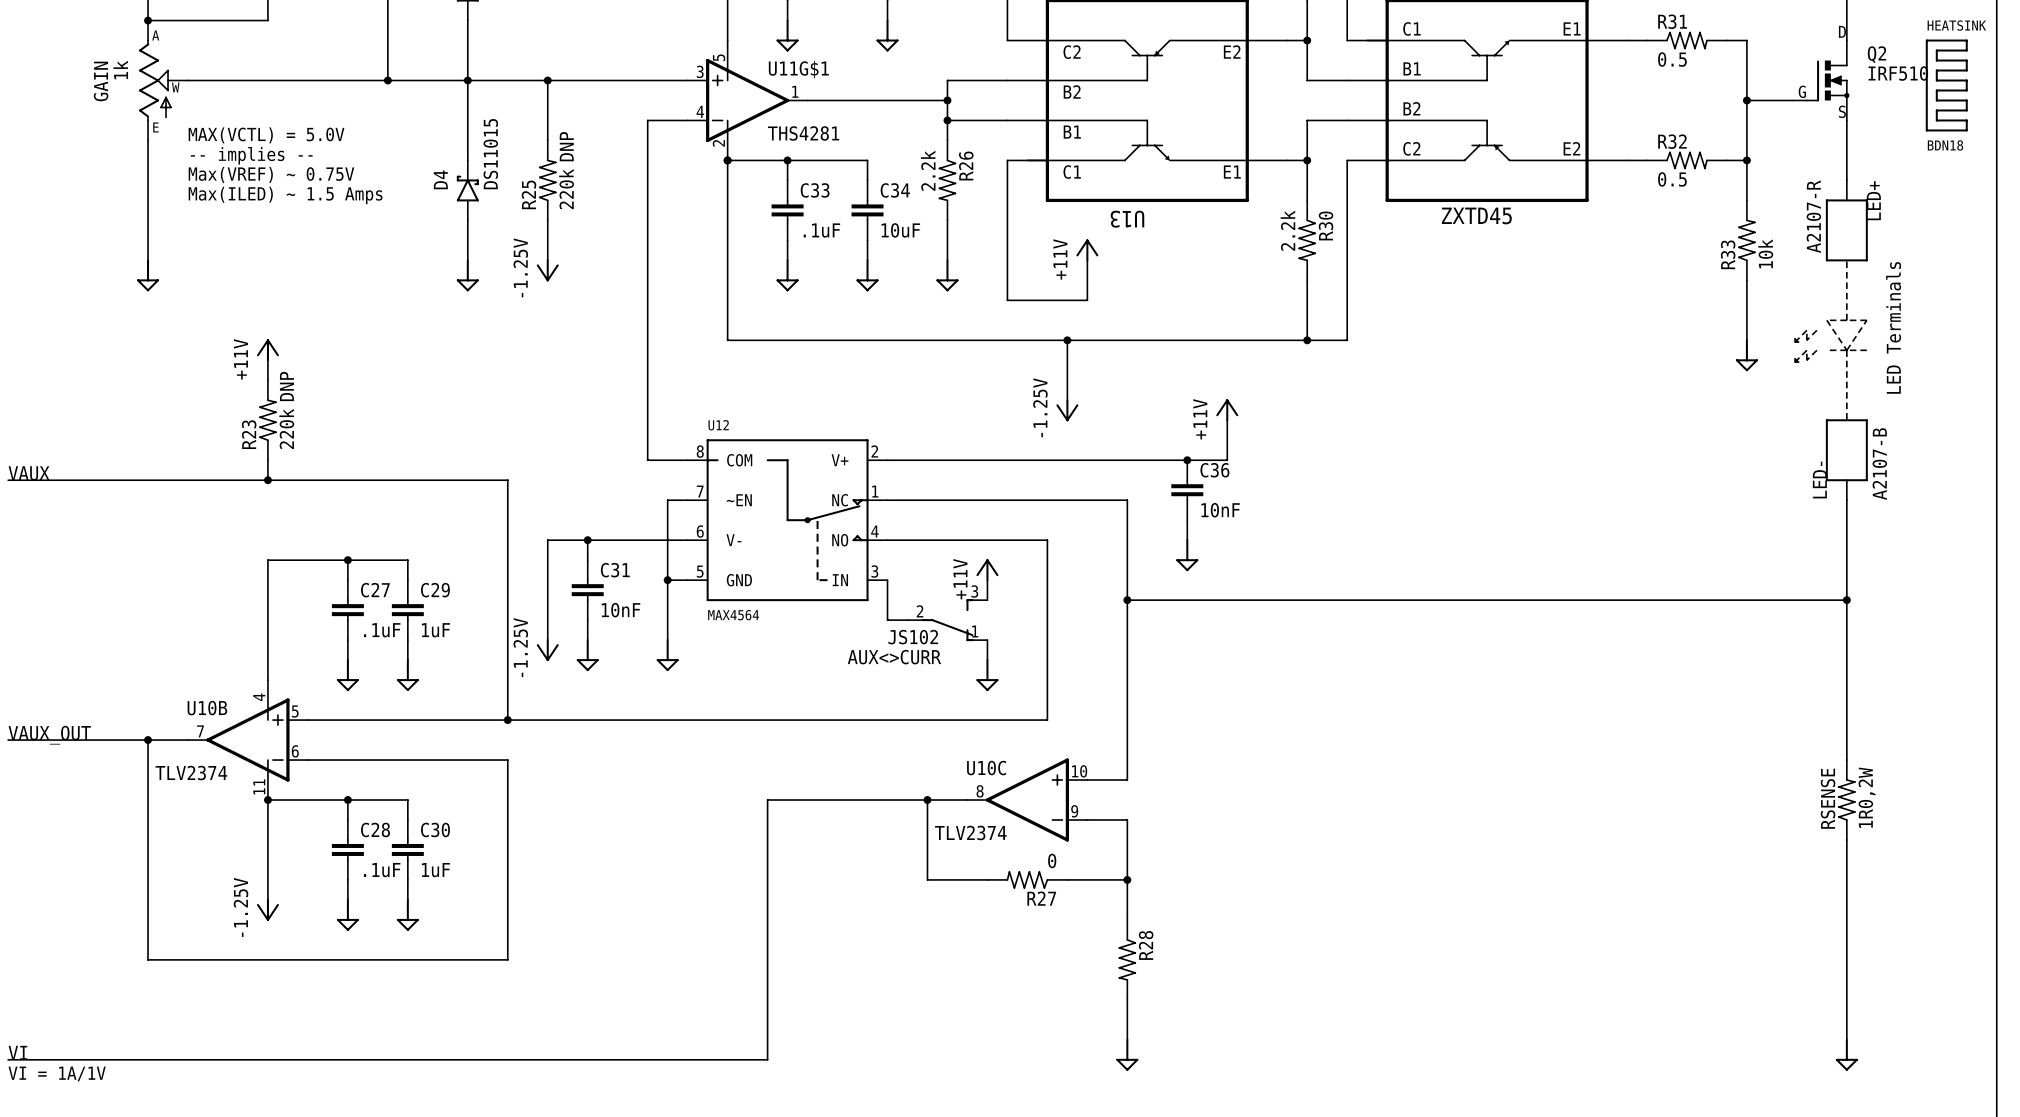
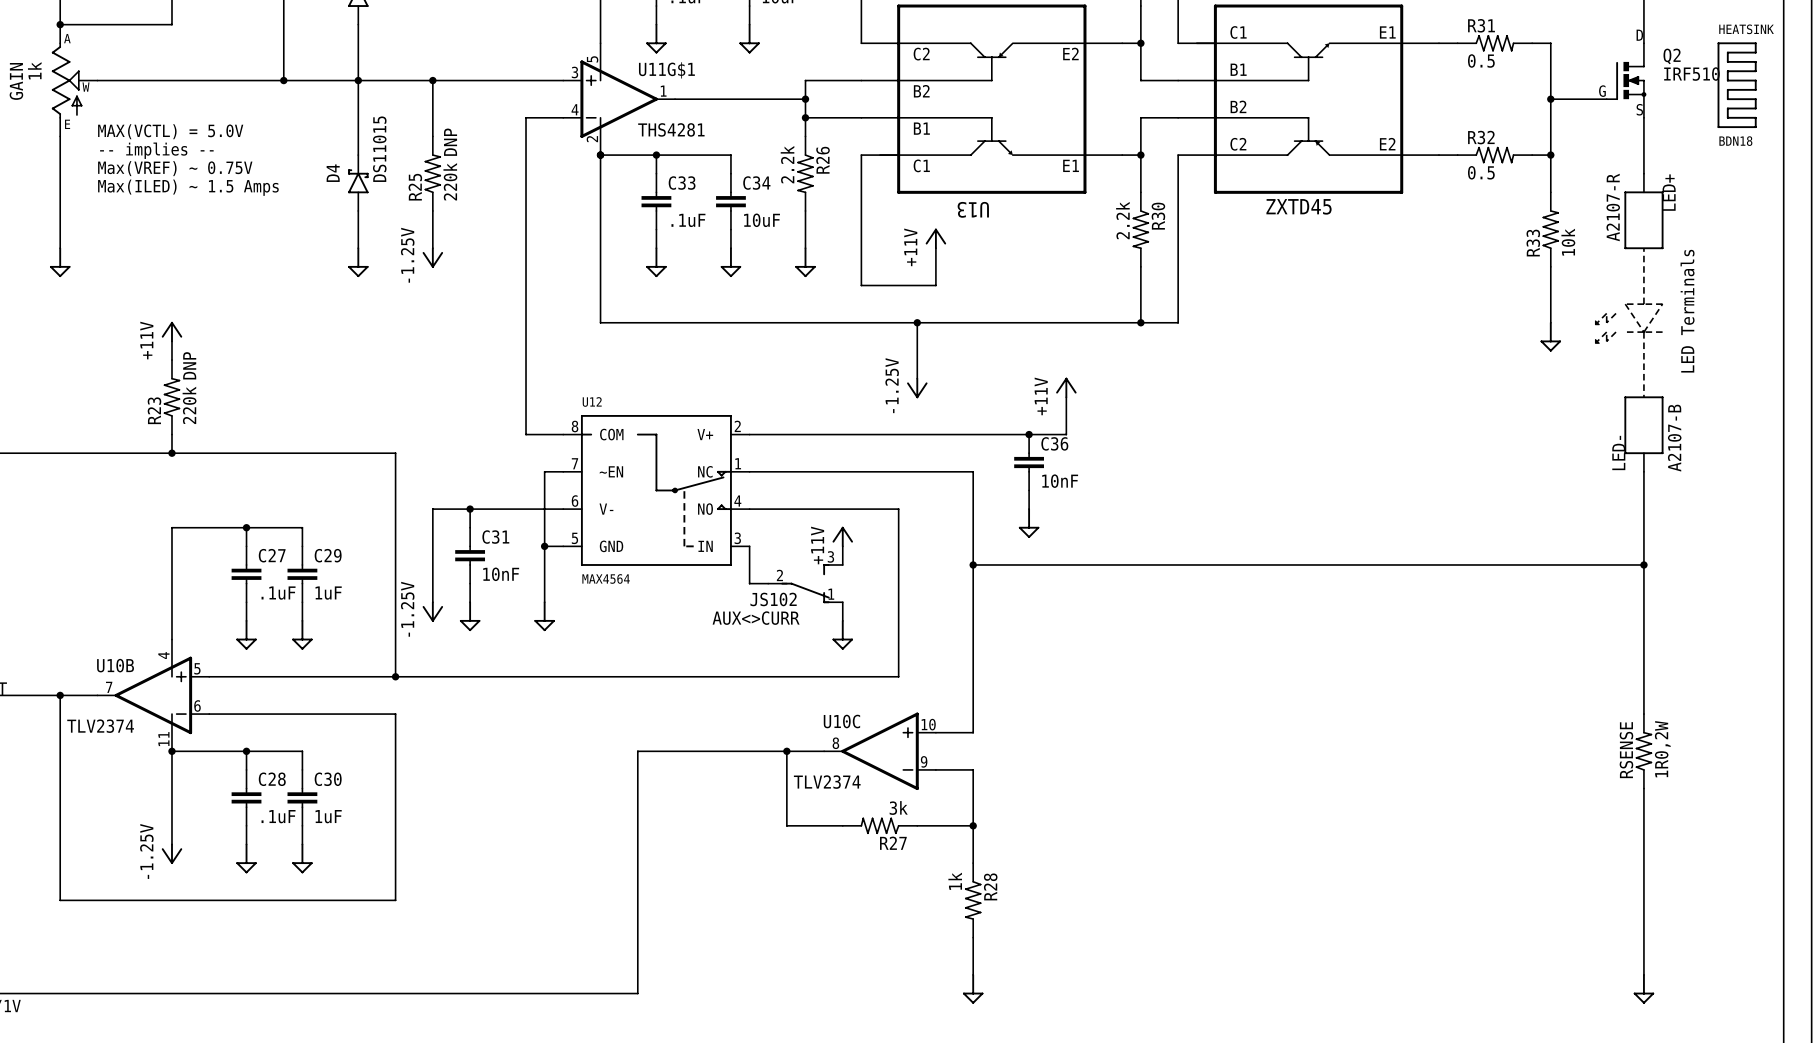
R27 value: 0 (1052, 860) -> 3k (898, 808)
R28 value: none -> 1k (955, 881)

